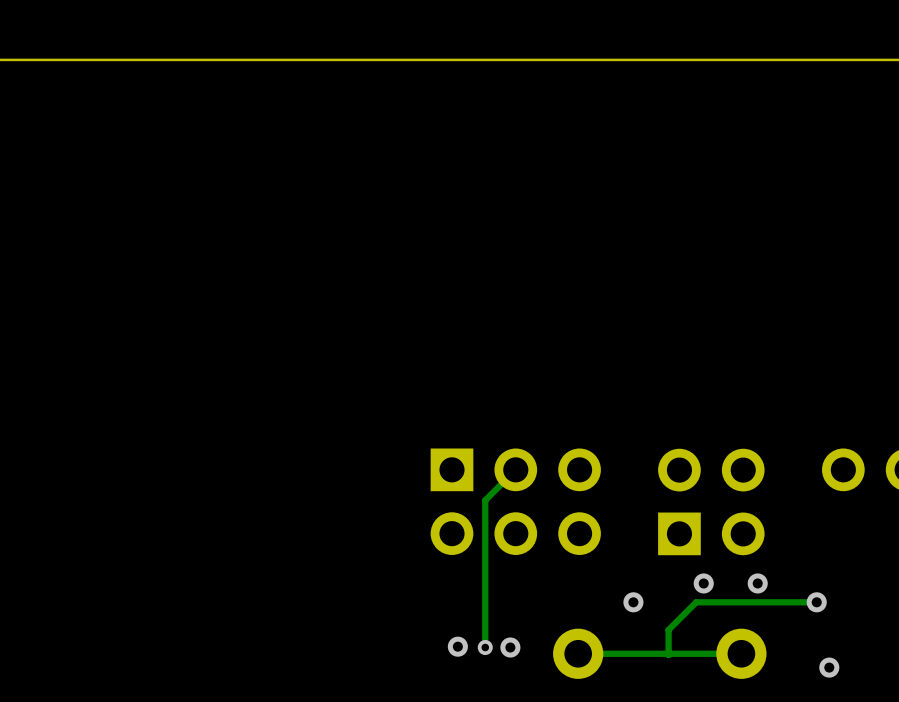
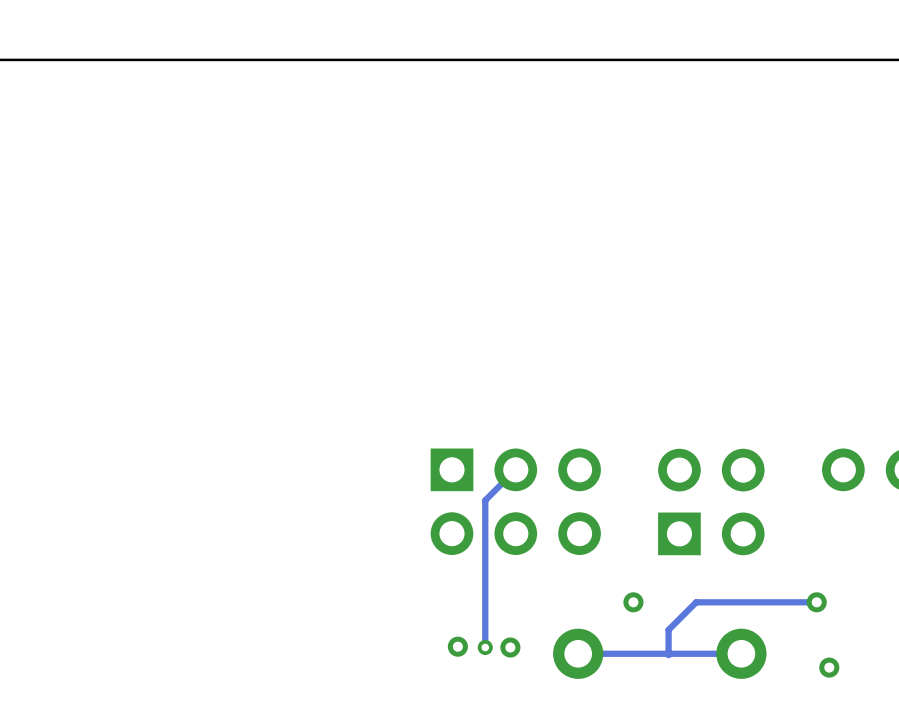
via: (703, 583) -> none
via: (757, 583) -> none

